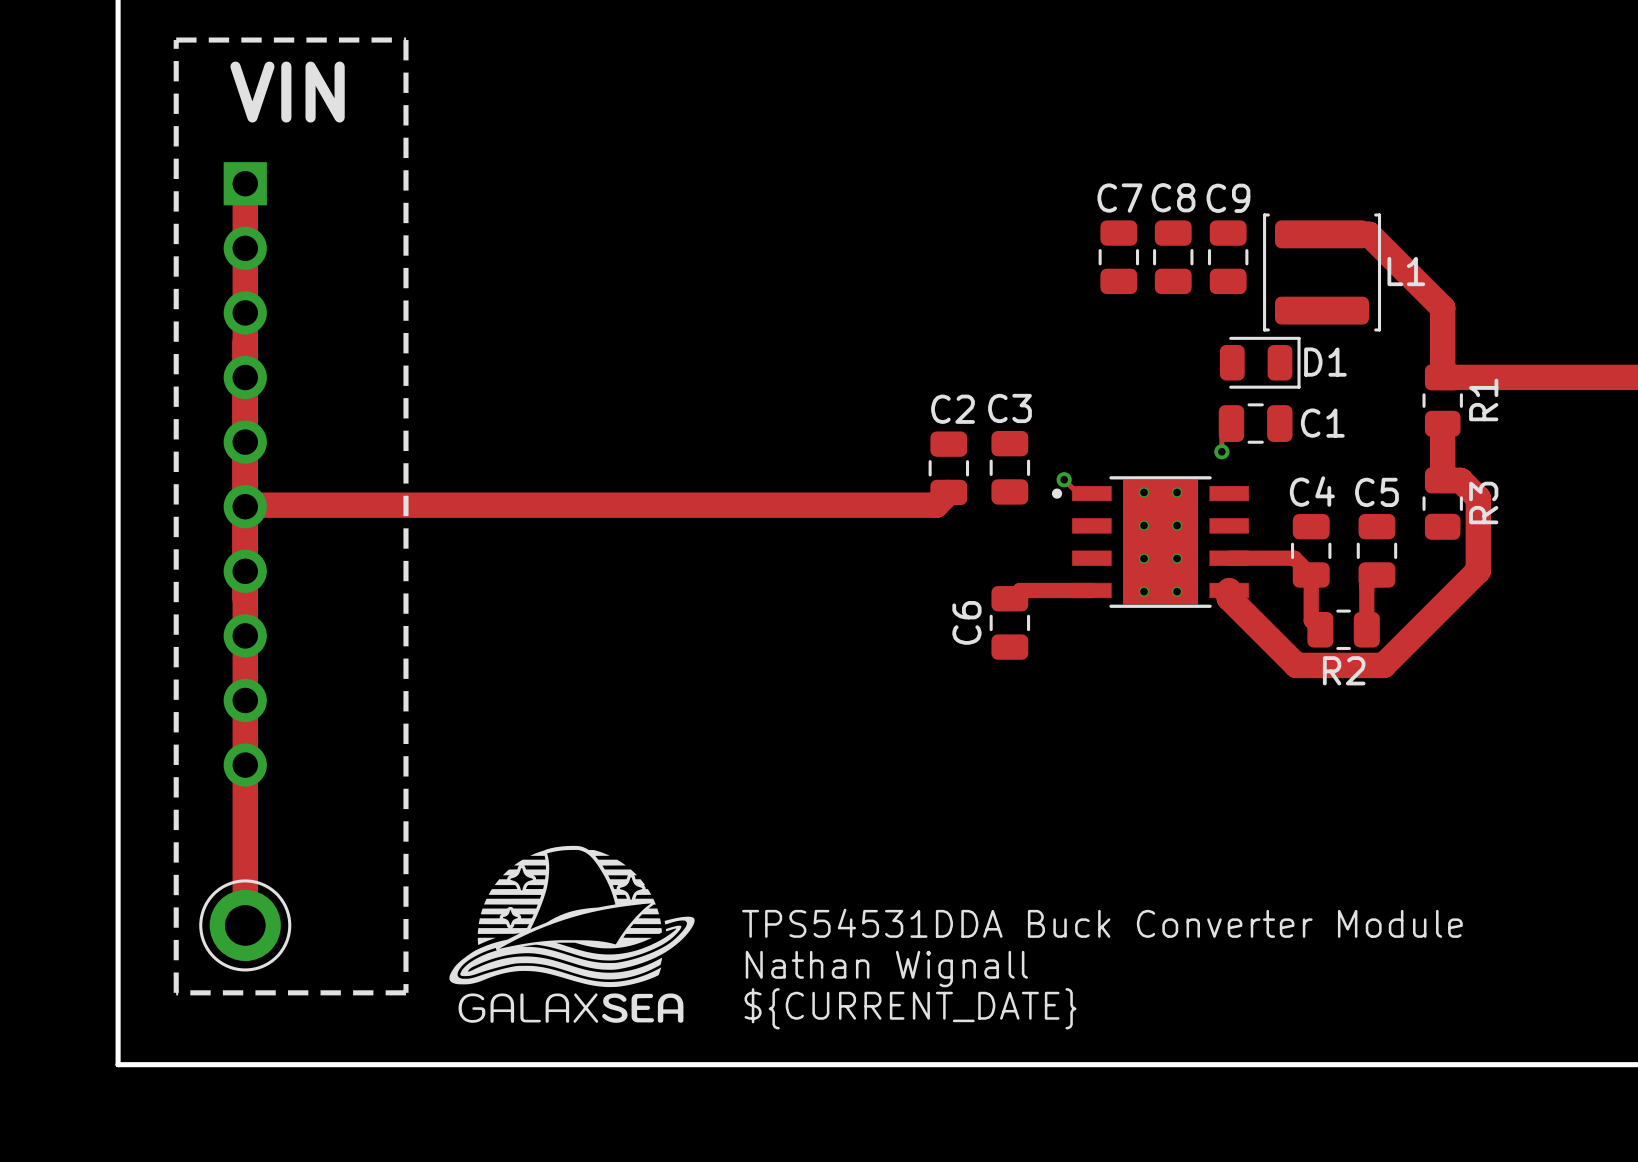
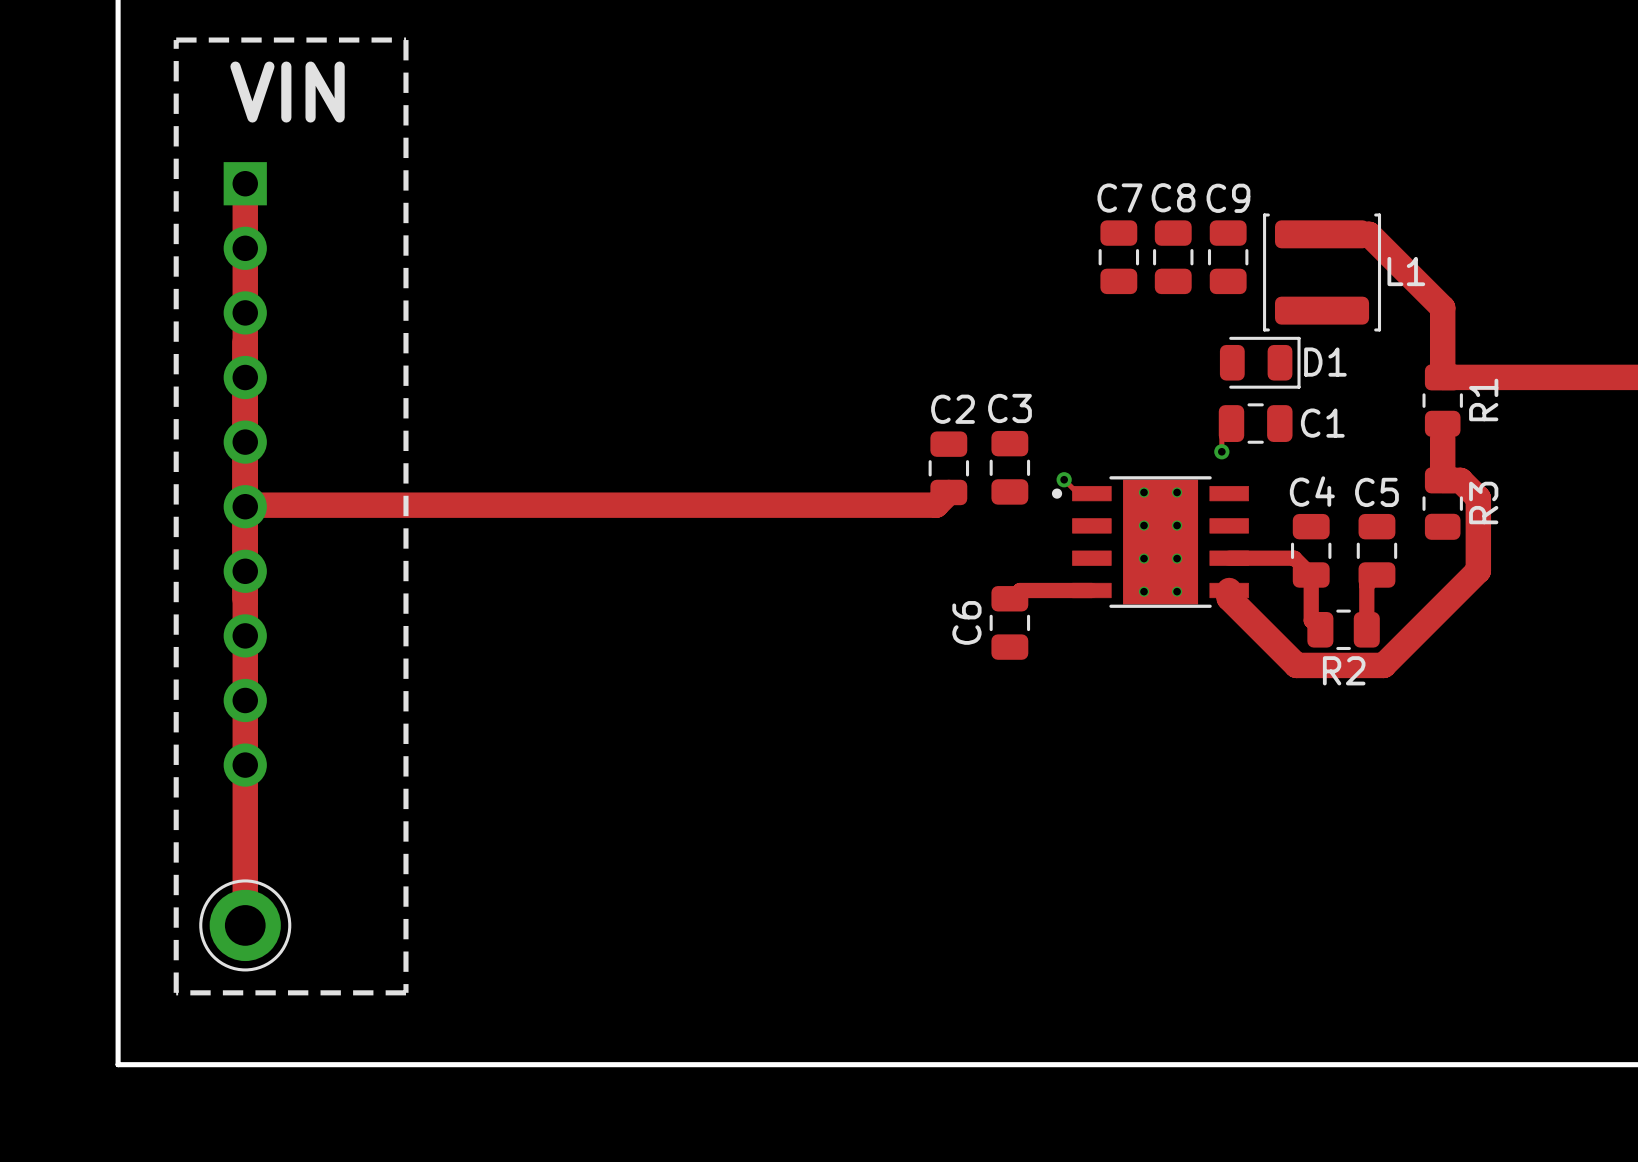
drawing: [449, 845, 695, 1023] -> none
text: TPS54531DDA Buck Converter Module (1102, 923) -> none
text: Nathan Wignall (886, 969) -> none
text: ${CURRENT_DATE} (910, 1008) -> none

